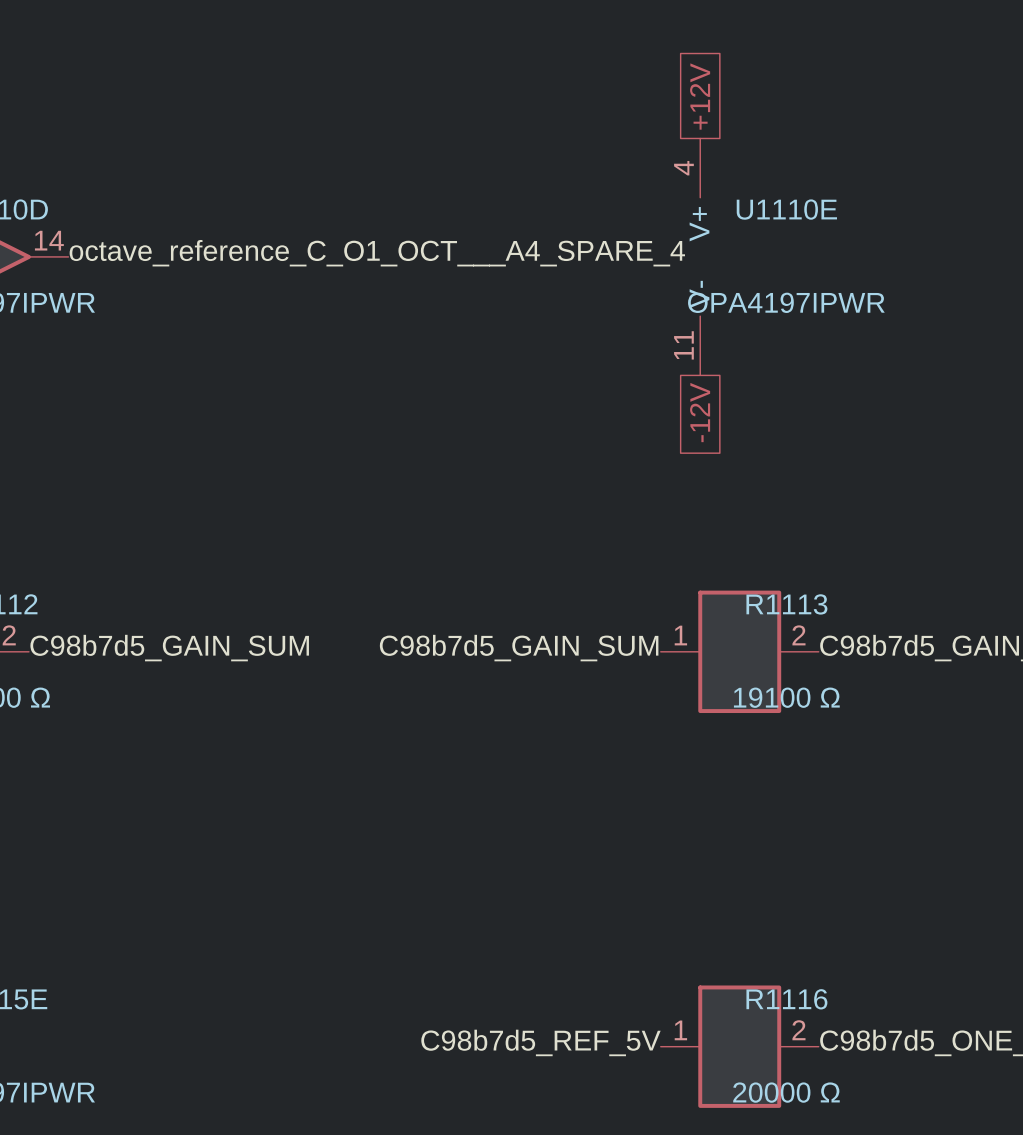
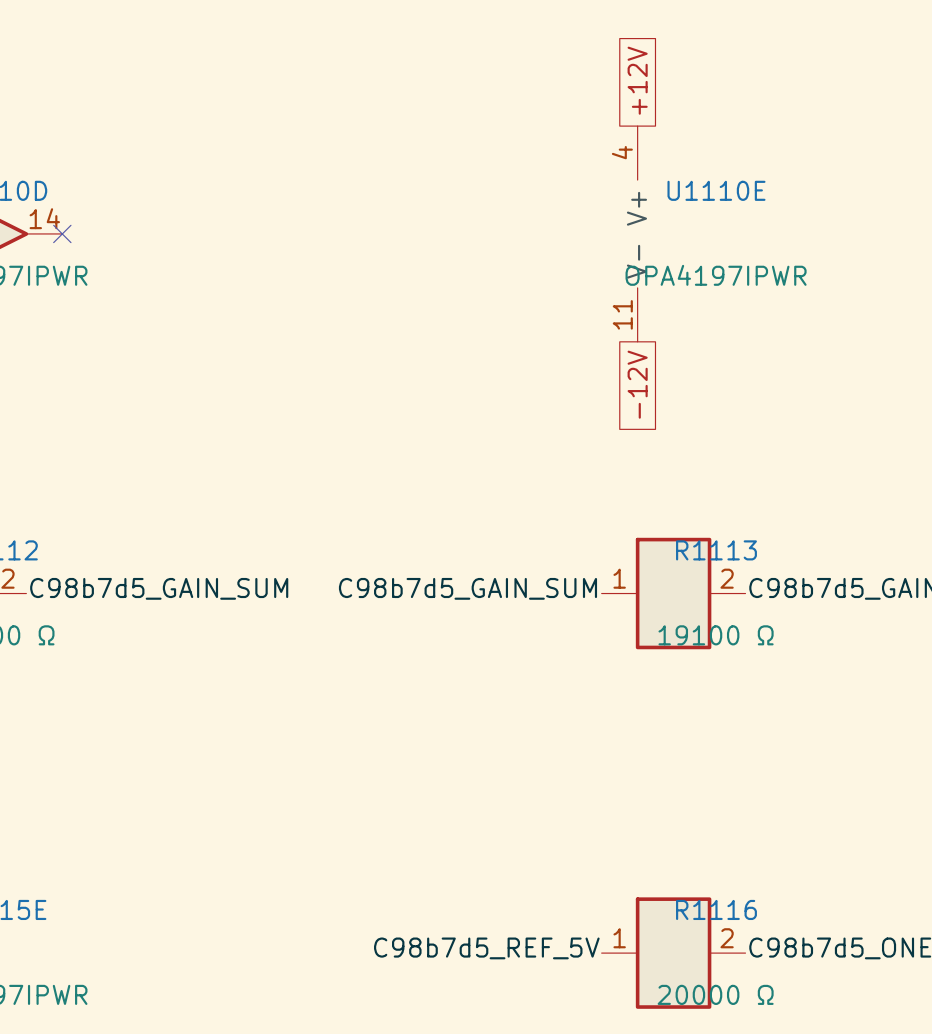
label: octave_reference_C_O1_OCT___A4_SPARE_4 (377, 253) -> none
no-connect mark: none -> (62, 233)

